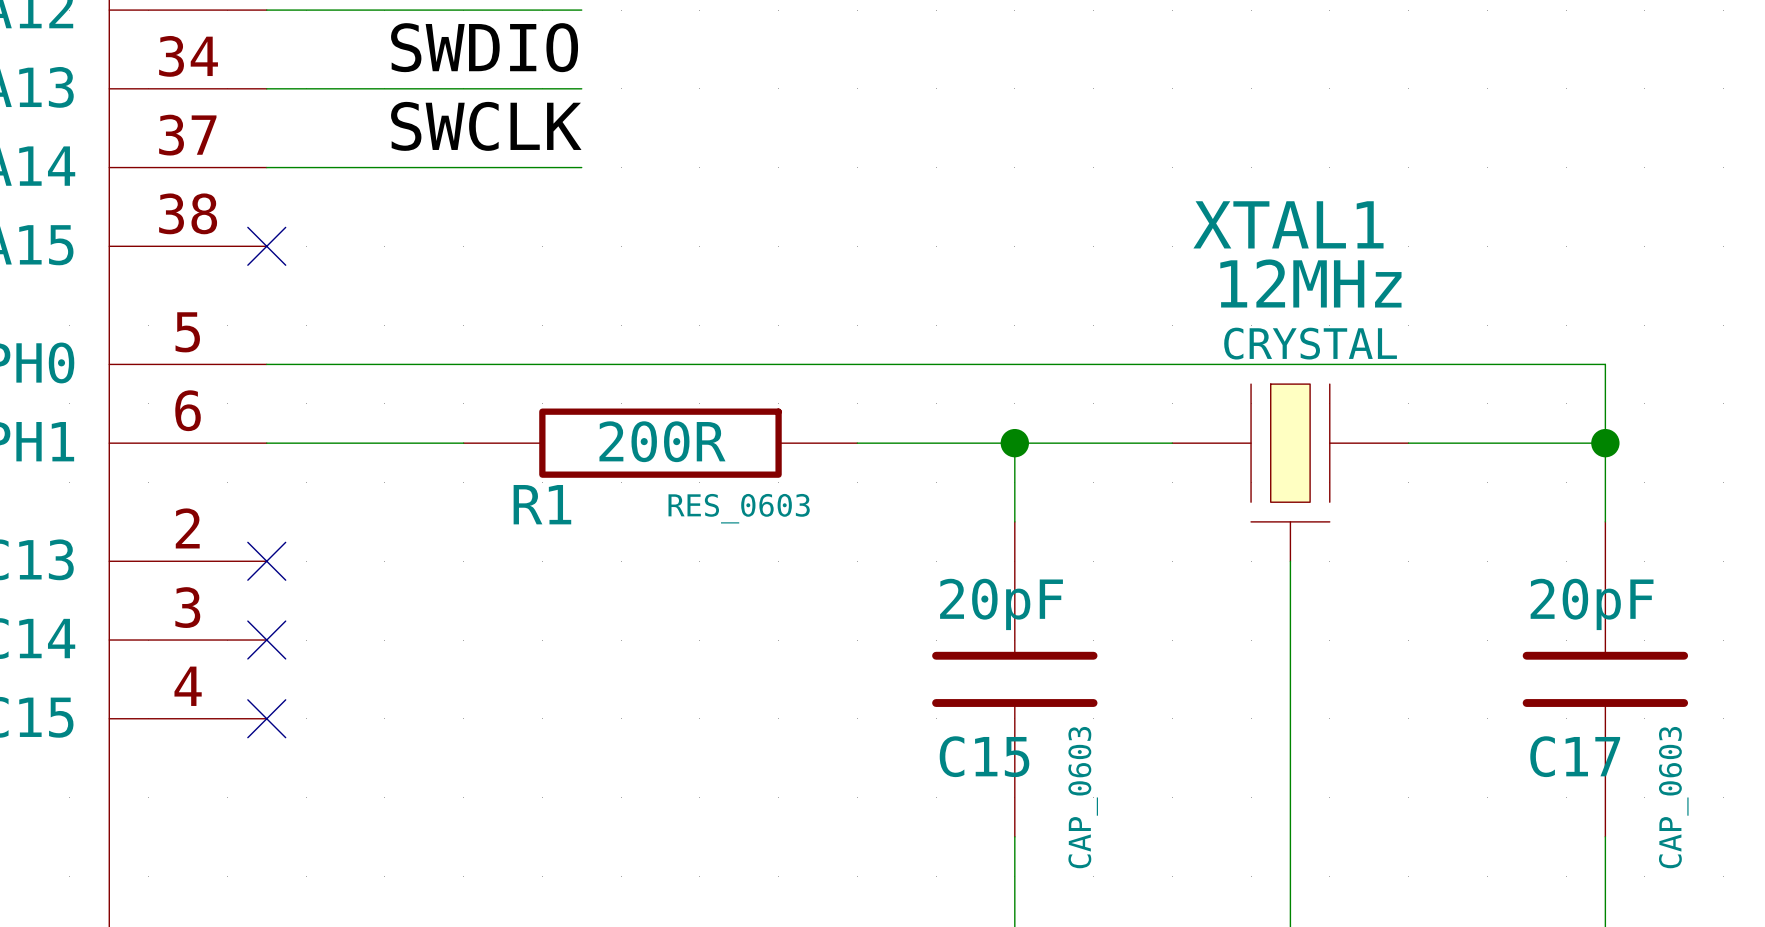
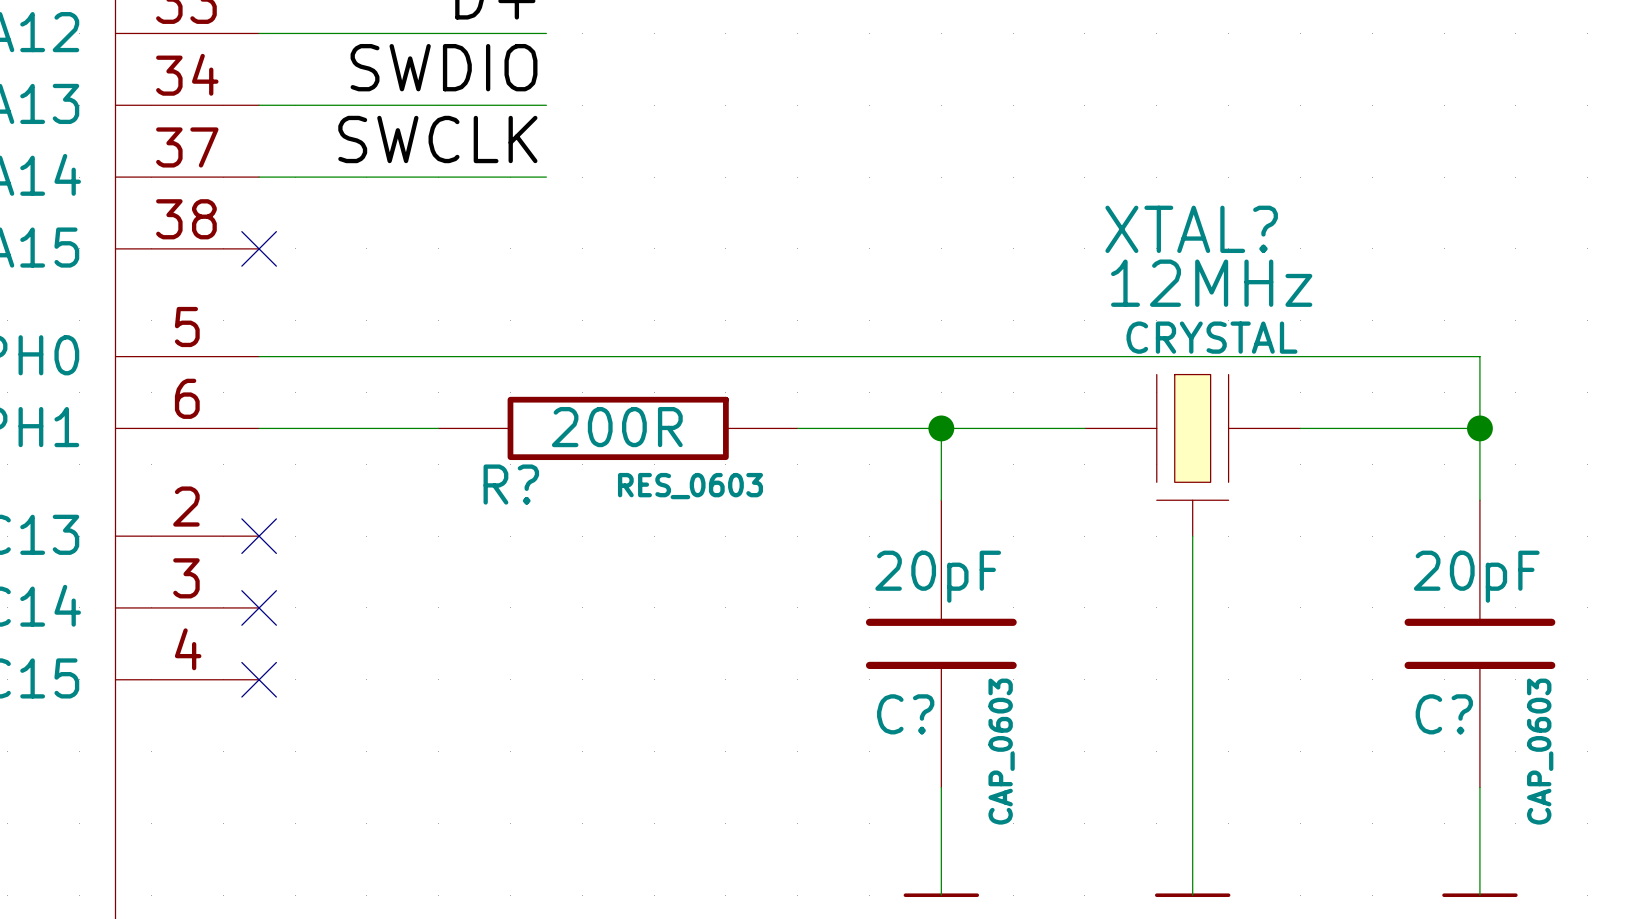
XTAL1 name: XTAL1 (1288, 224) -> XTAL? (1191, 229)
R1 name: R1 (542, 504) -> R? (511, 484)
C15 name: C15 (984, 756) -> C? (905, 714)
C17 name: C17 (1575, 756) -> C? (1444, 714)

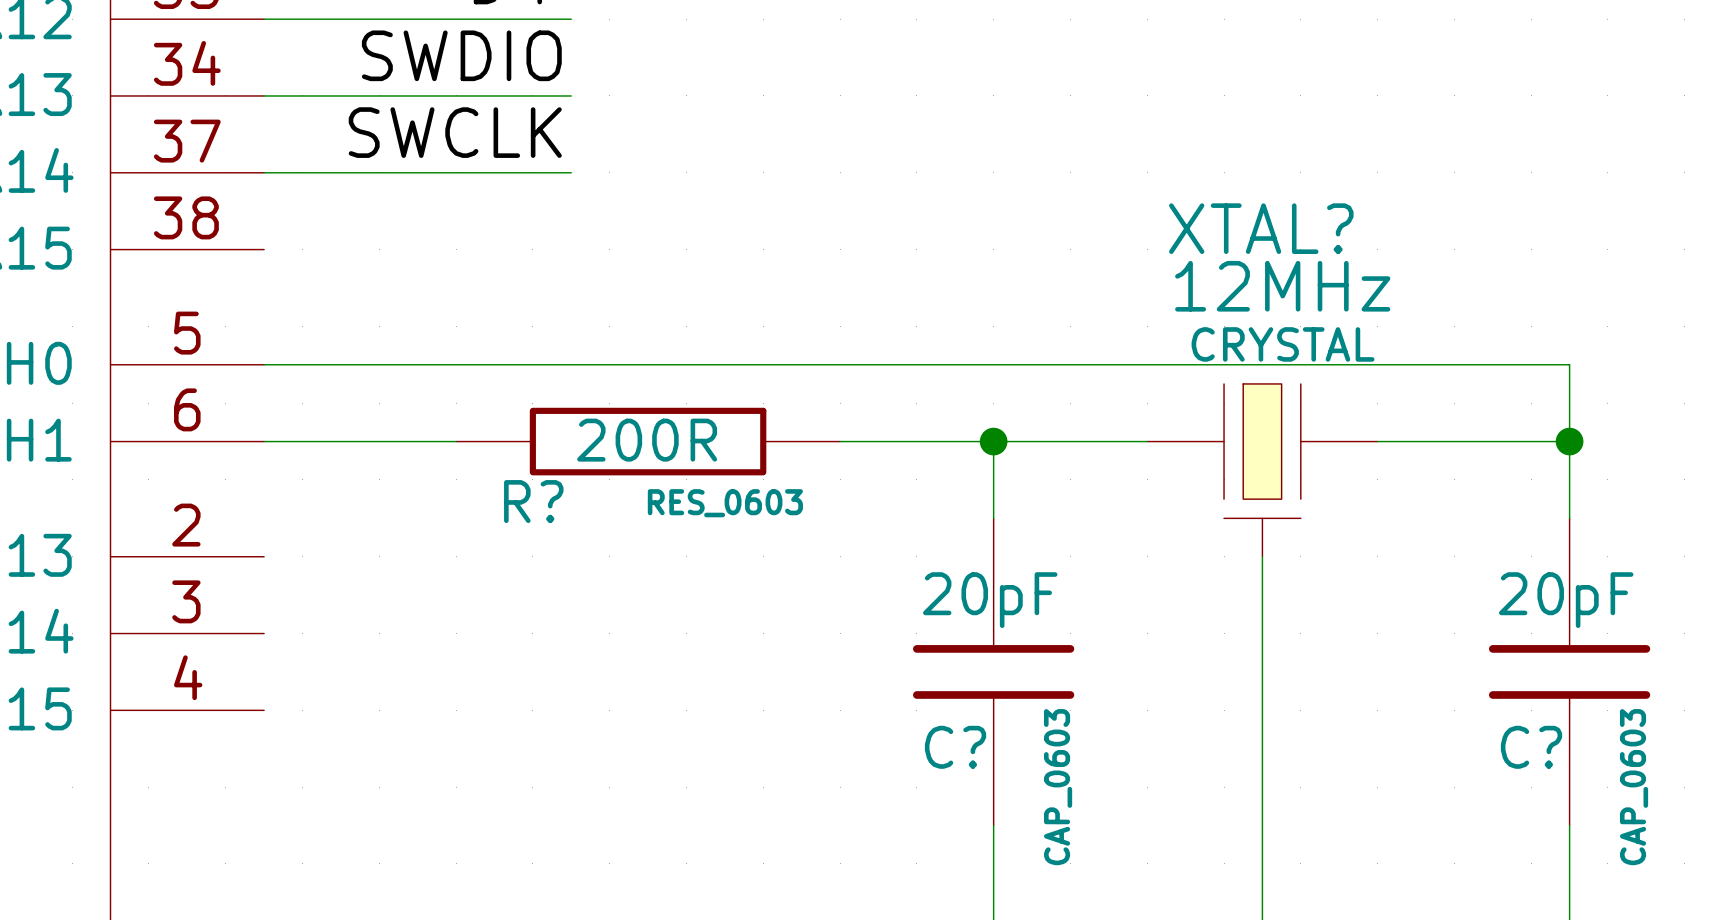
no-connect mark: (259, 248) -> none
no-connect mark: (259, 536) -> none
no-connect mark: (259, 607) -> none
no-connect mark: (259, 679) -> none

